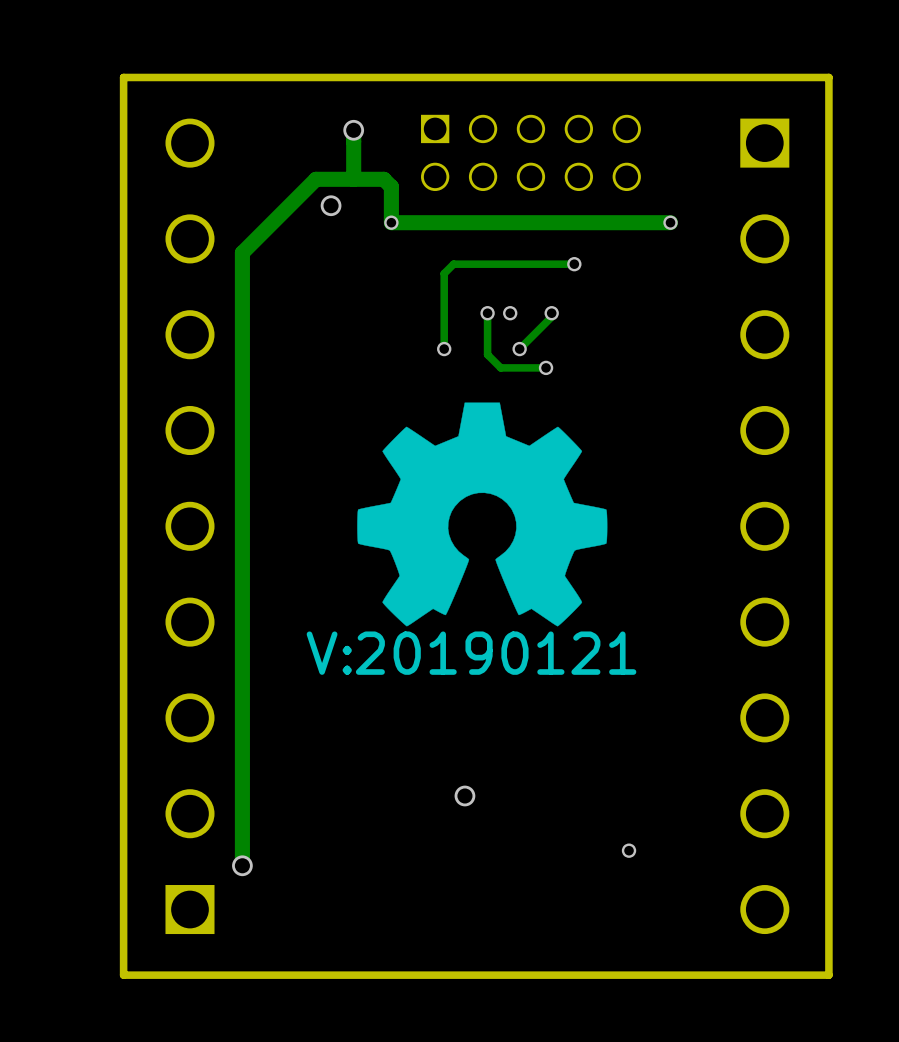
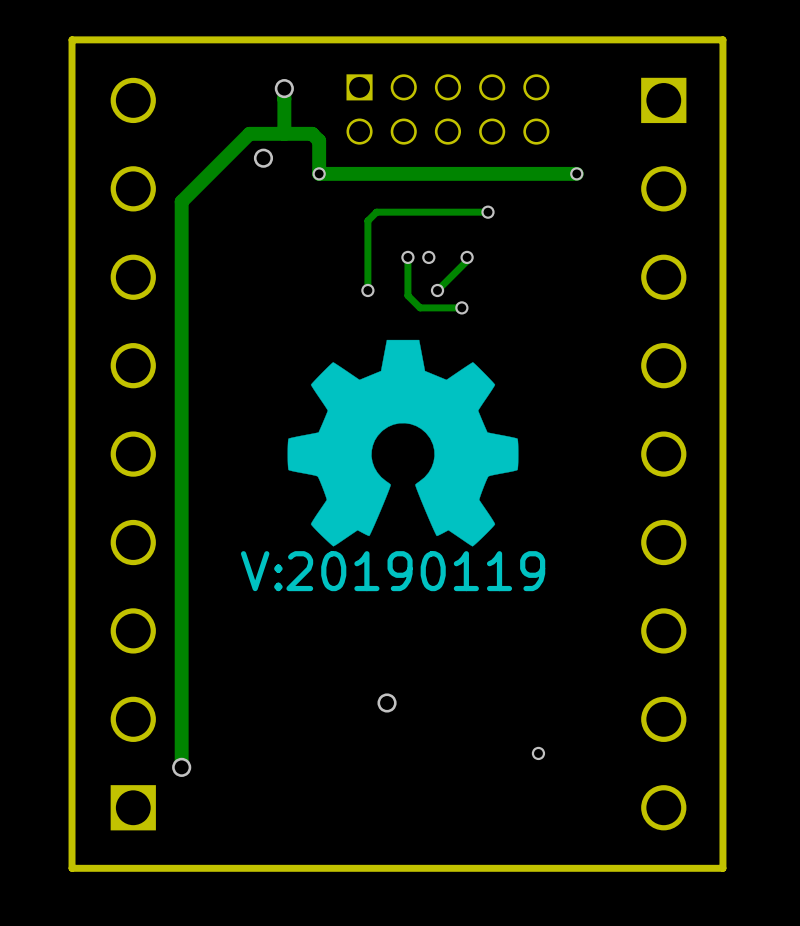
drawing shape: [306, 631, 637, 675] -> [240, 551, 546, 592]

